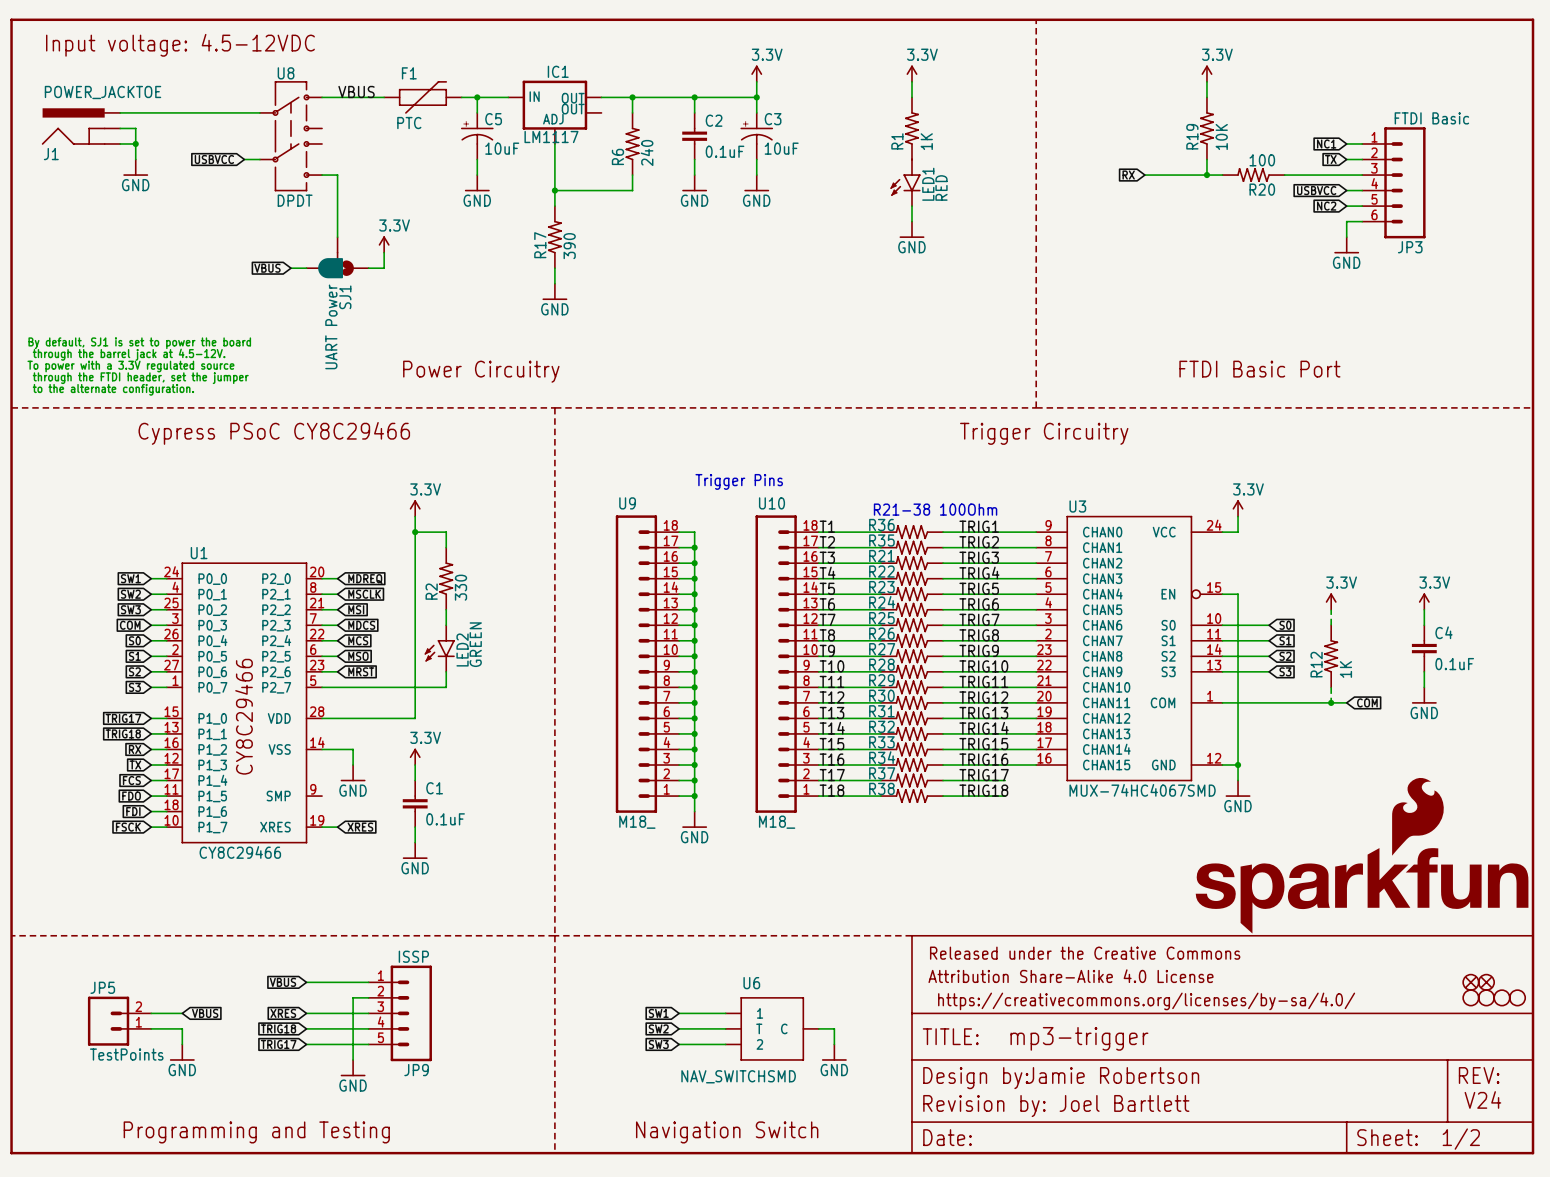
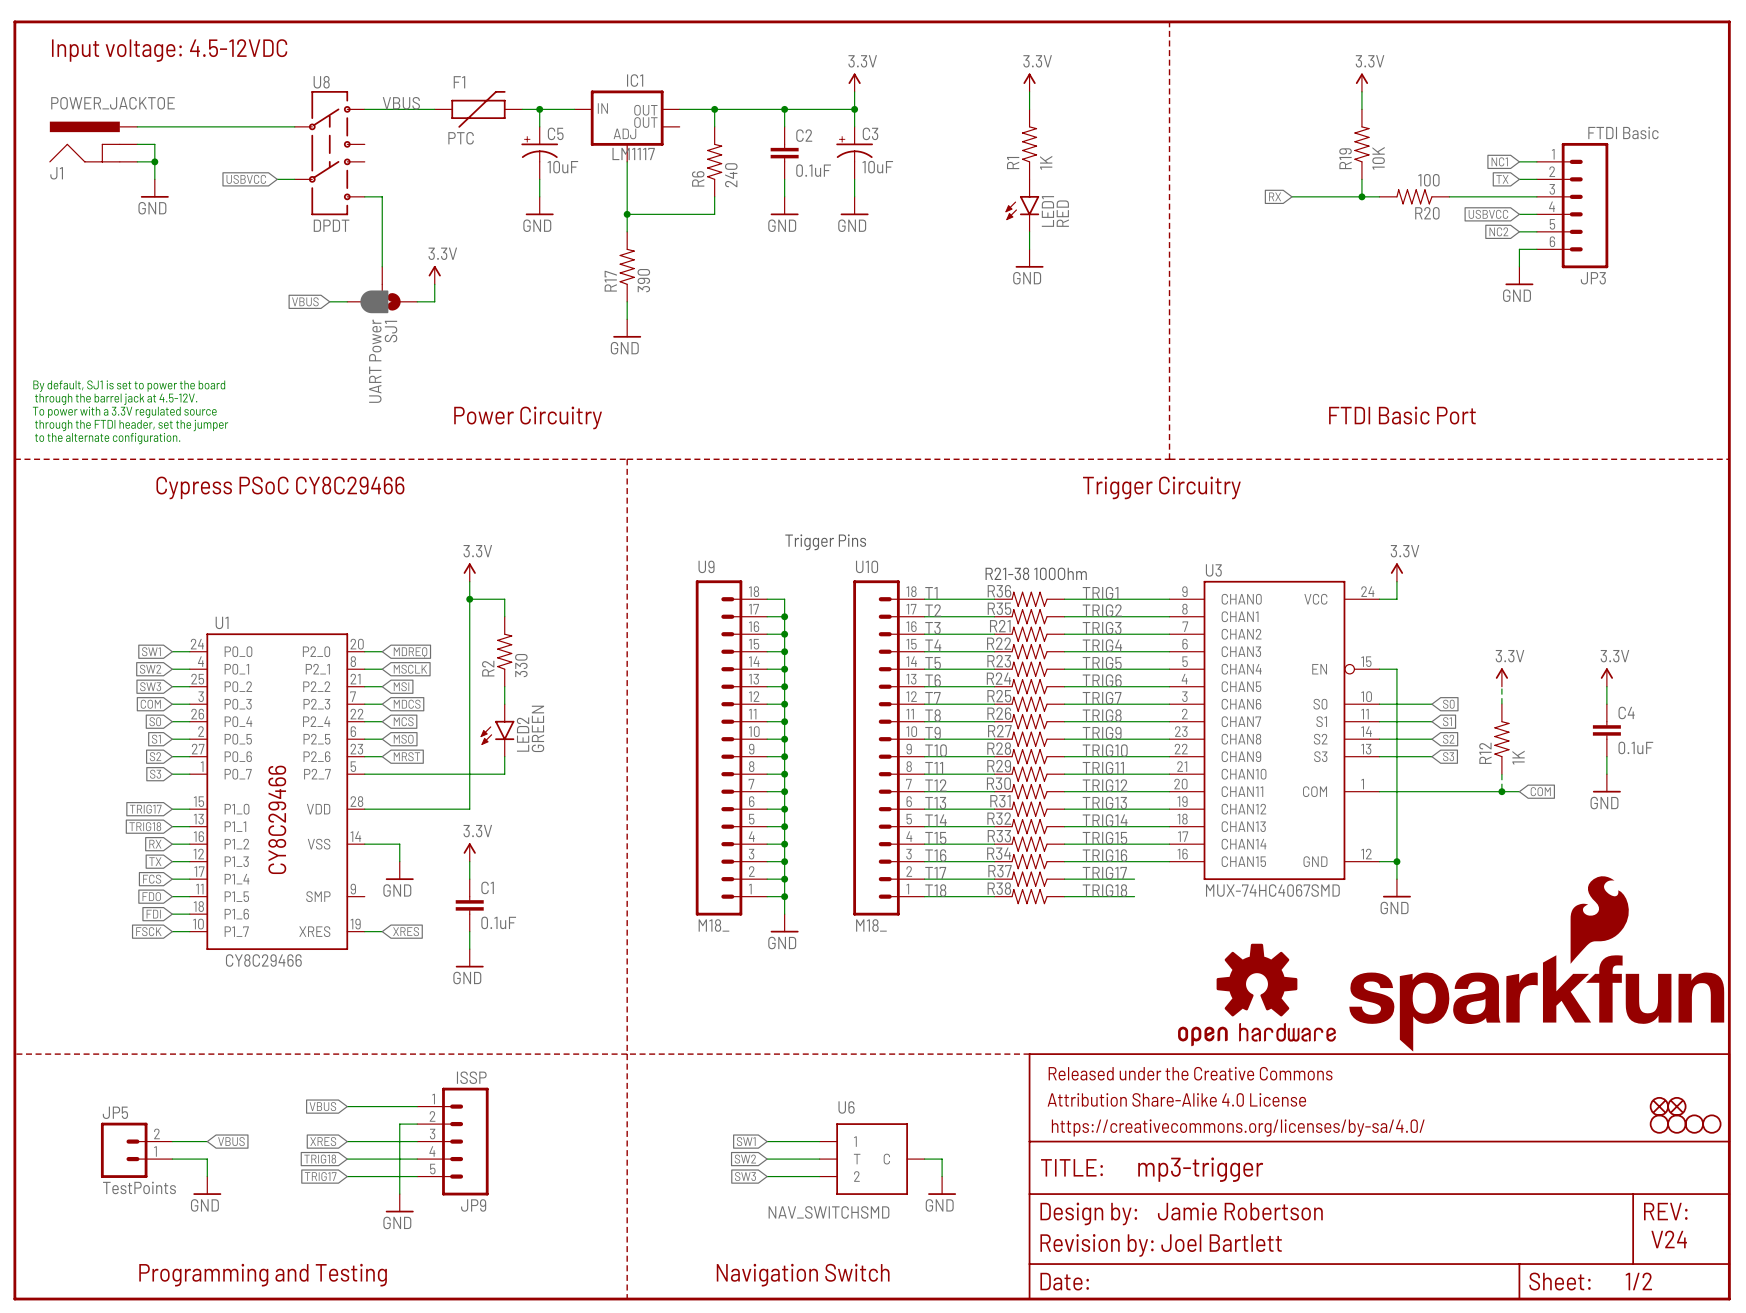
part: none -> (1256, 994)

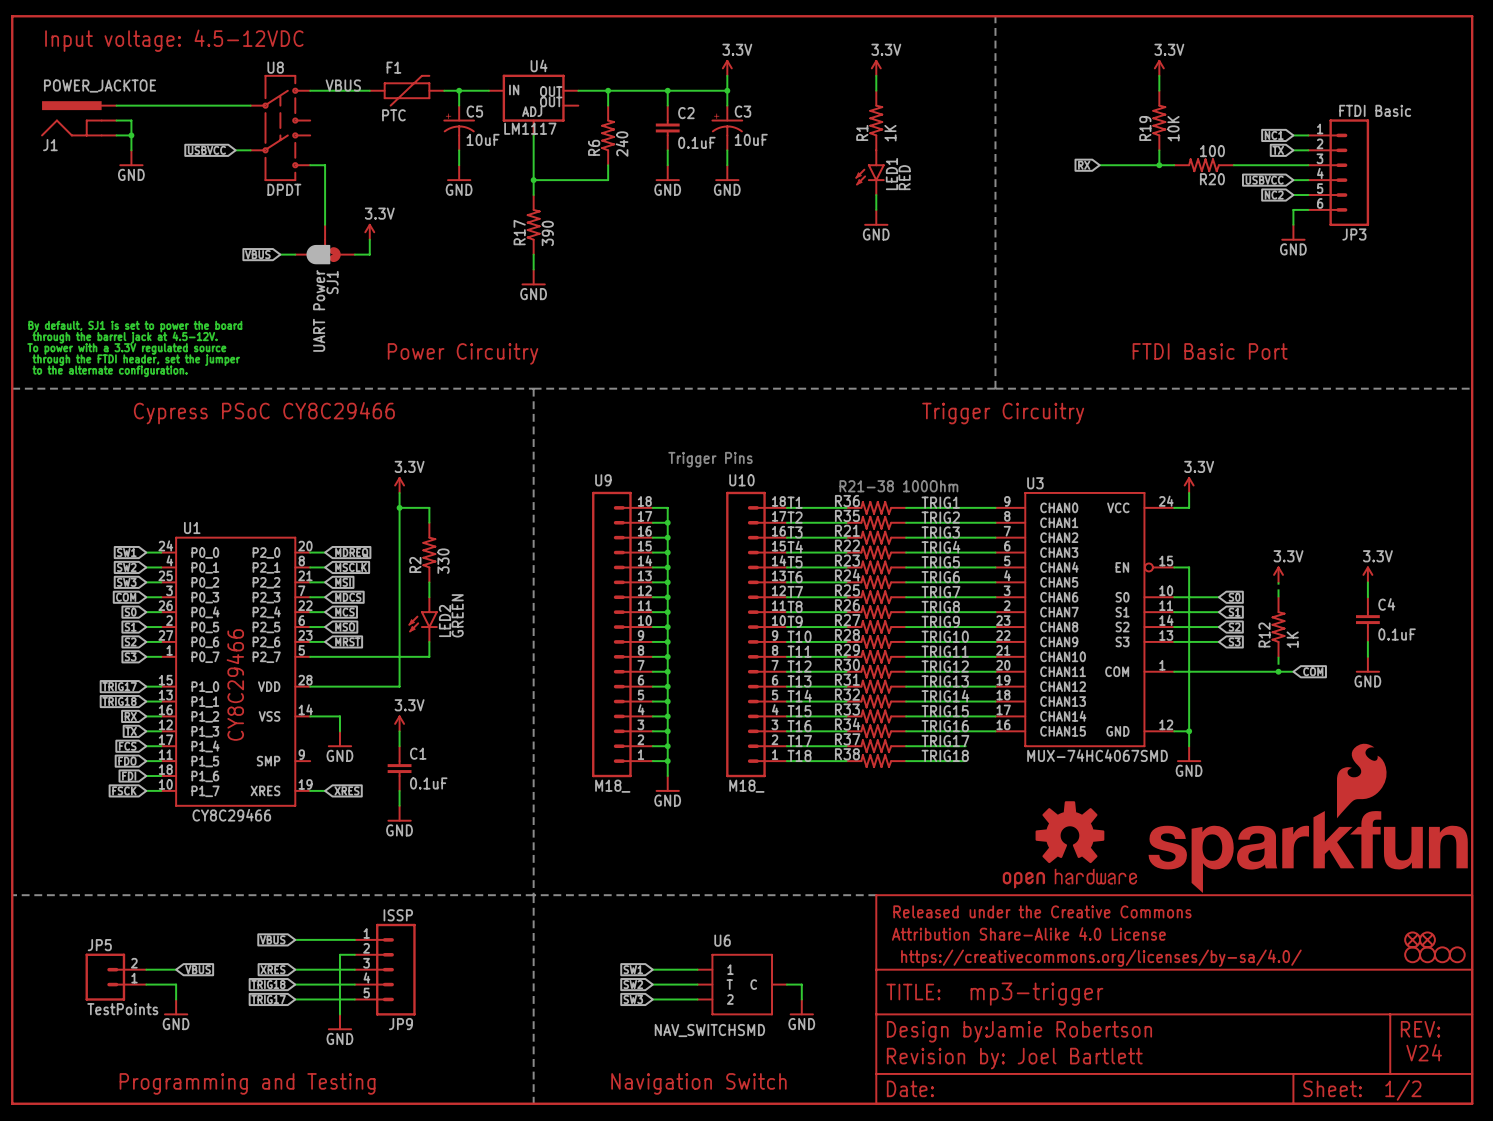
line: (1169, 21) (1169, 459) -> none
line: none -> (995, 16) (995, 388)
IC1 name: IC1 (635, 80) -> U4 (539, 65)
line: (14, 459) (1729, 459) -> none
line: none -> (12, 388) (1472, 388)
line: (627, 459) (627, 1299) -> none
line: none -> (533, 388) (533, 1103)
line: (14, 1054) (1029, 1054) -> none
line: none -> (12, 895) (876, 895)

